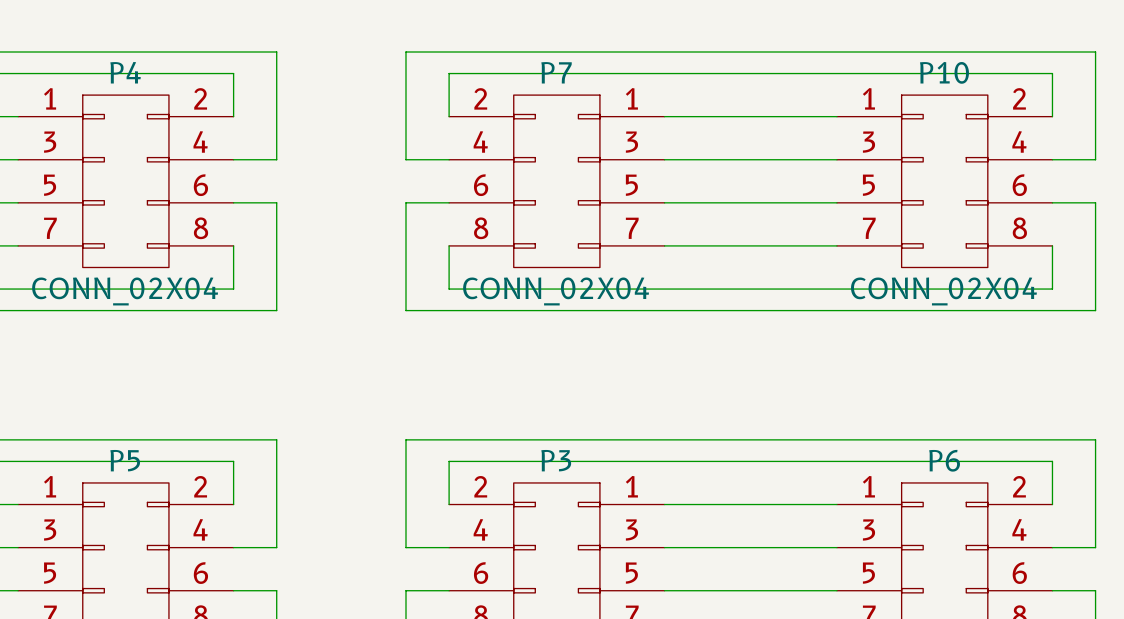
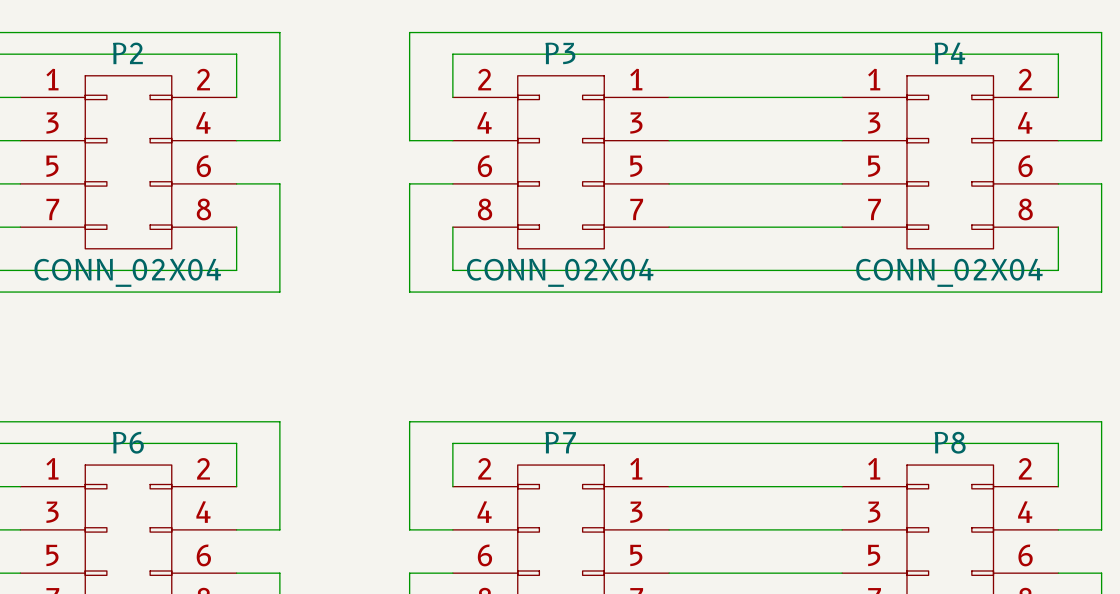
P4 name: P4 (125, 72) -> P2 (127, 53)
P7 name: P7 (556, 72) -> P3 (560, 53)
P10 name: P10 (944, 72) -> P4 (949, 53)
P5 name: P5 (125, 460) -> P6 (128, 442)
P3 name: P3 (556, 460) -> P7 (560, 442)
P6 name: P6 (944, 460) -> P8 (950, 442)

